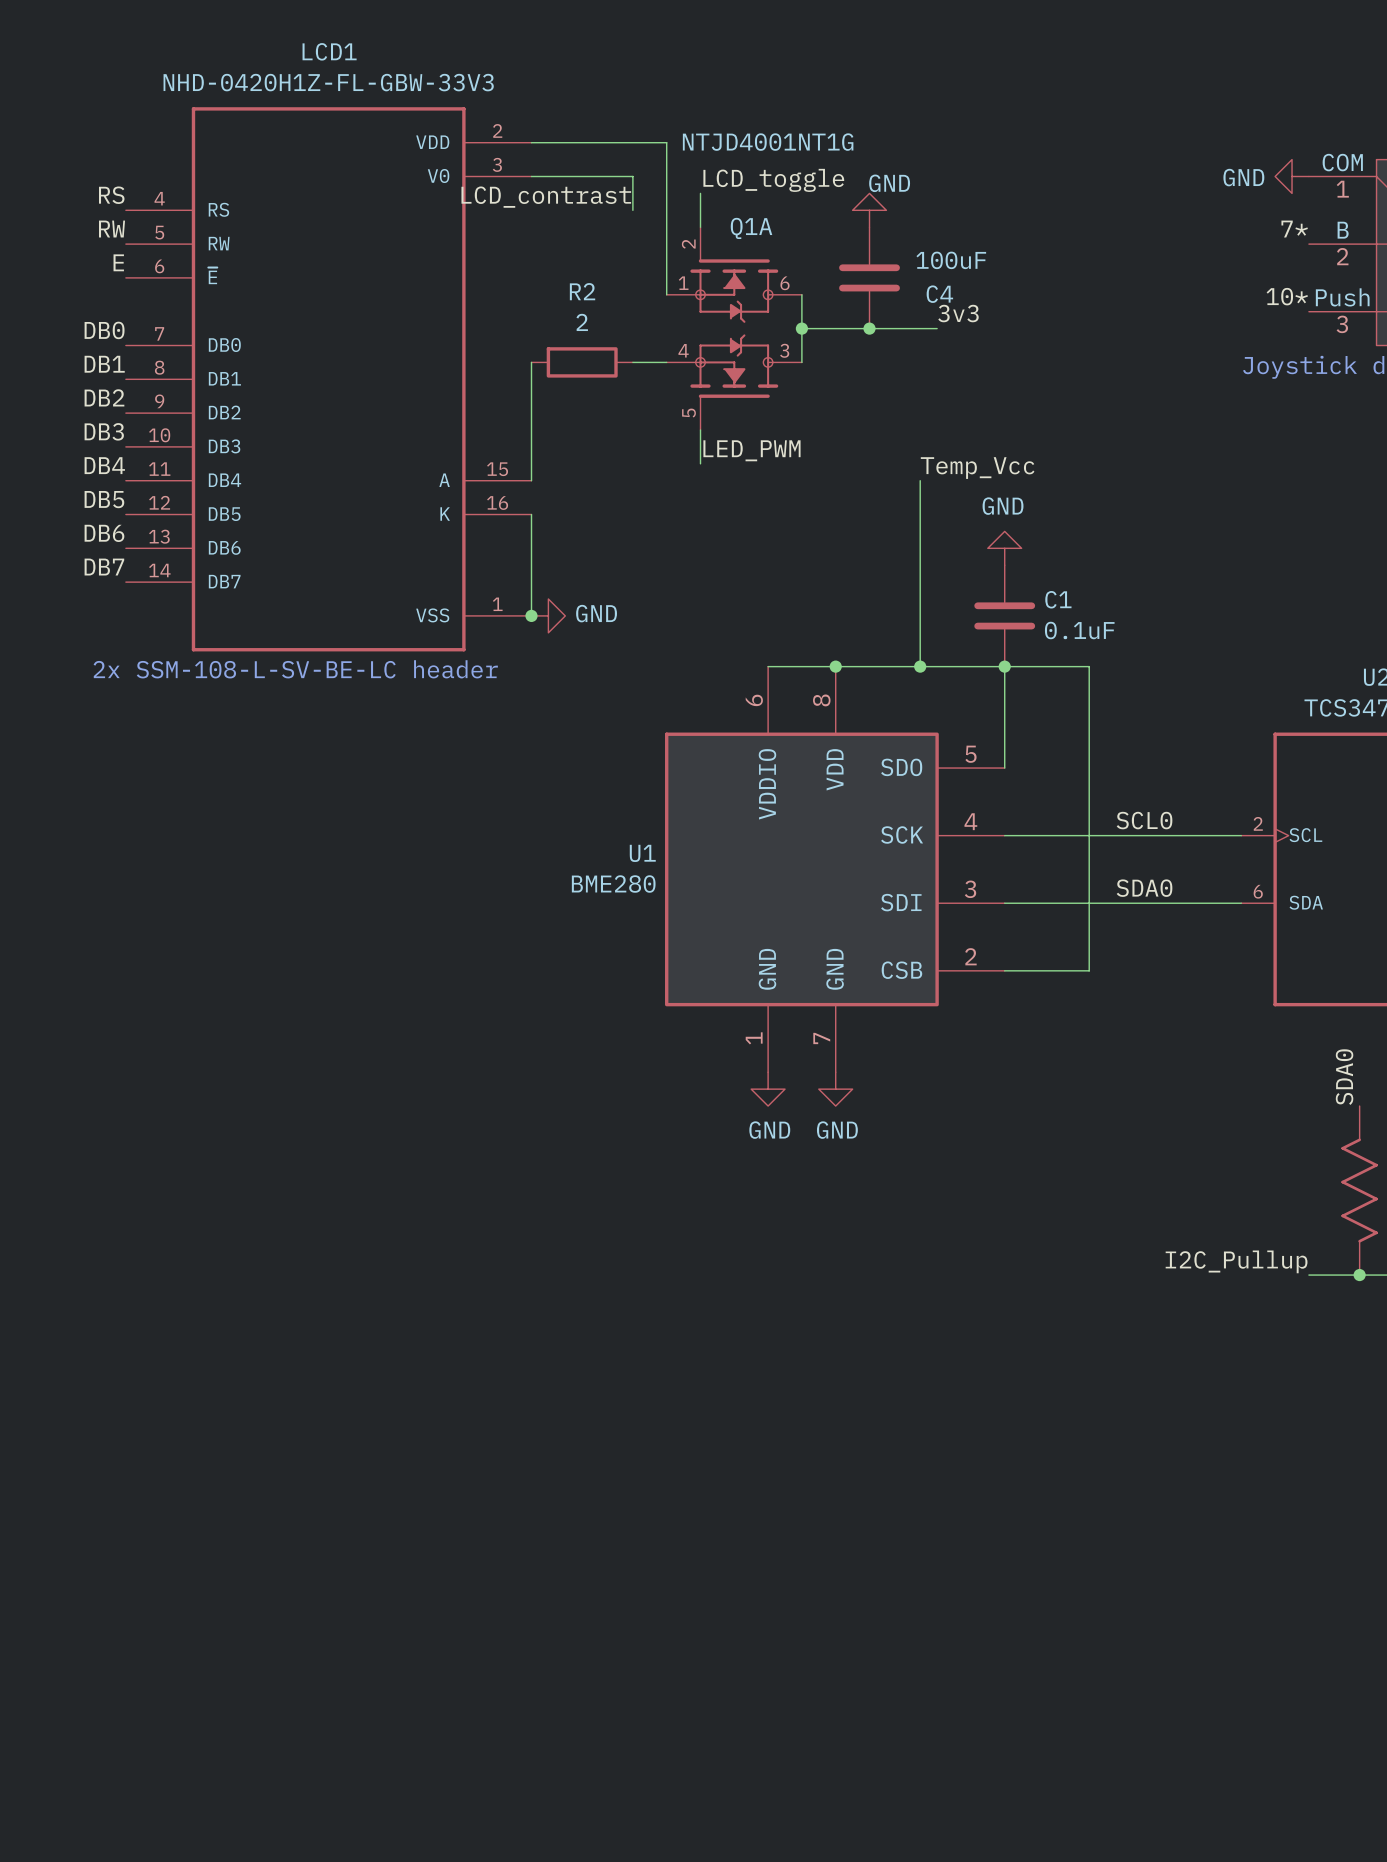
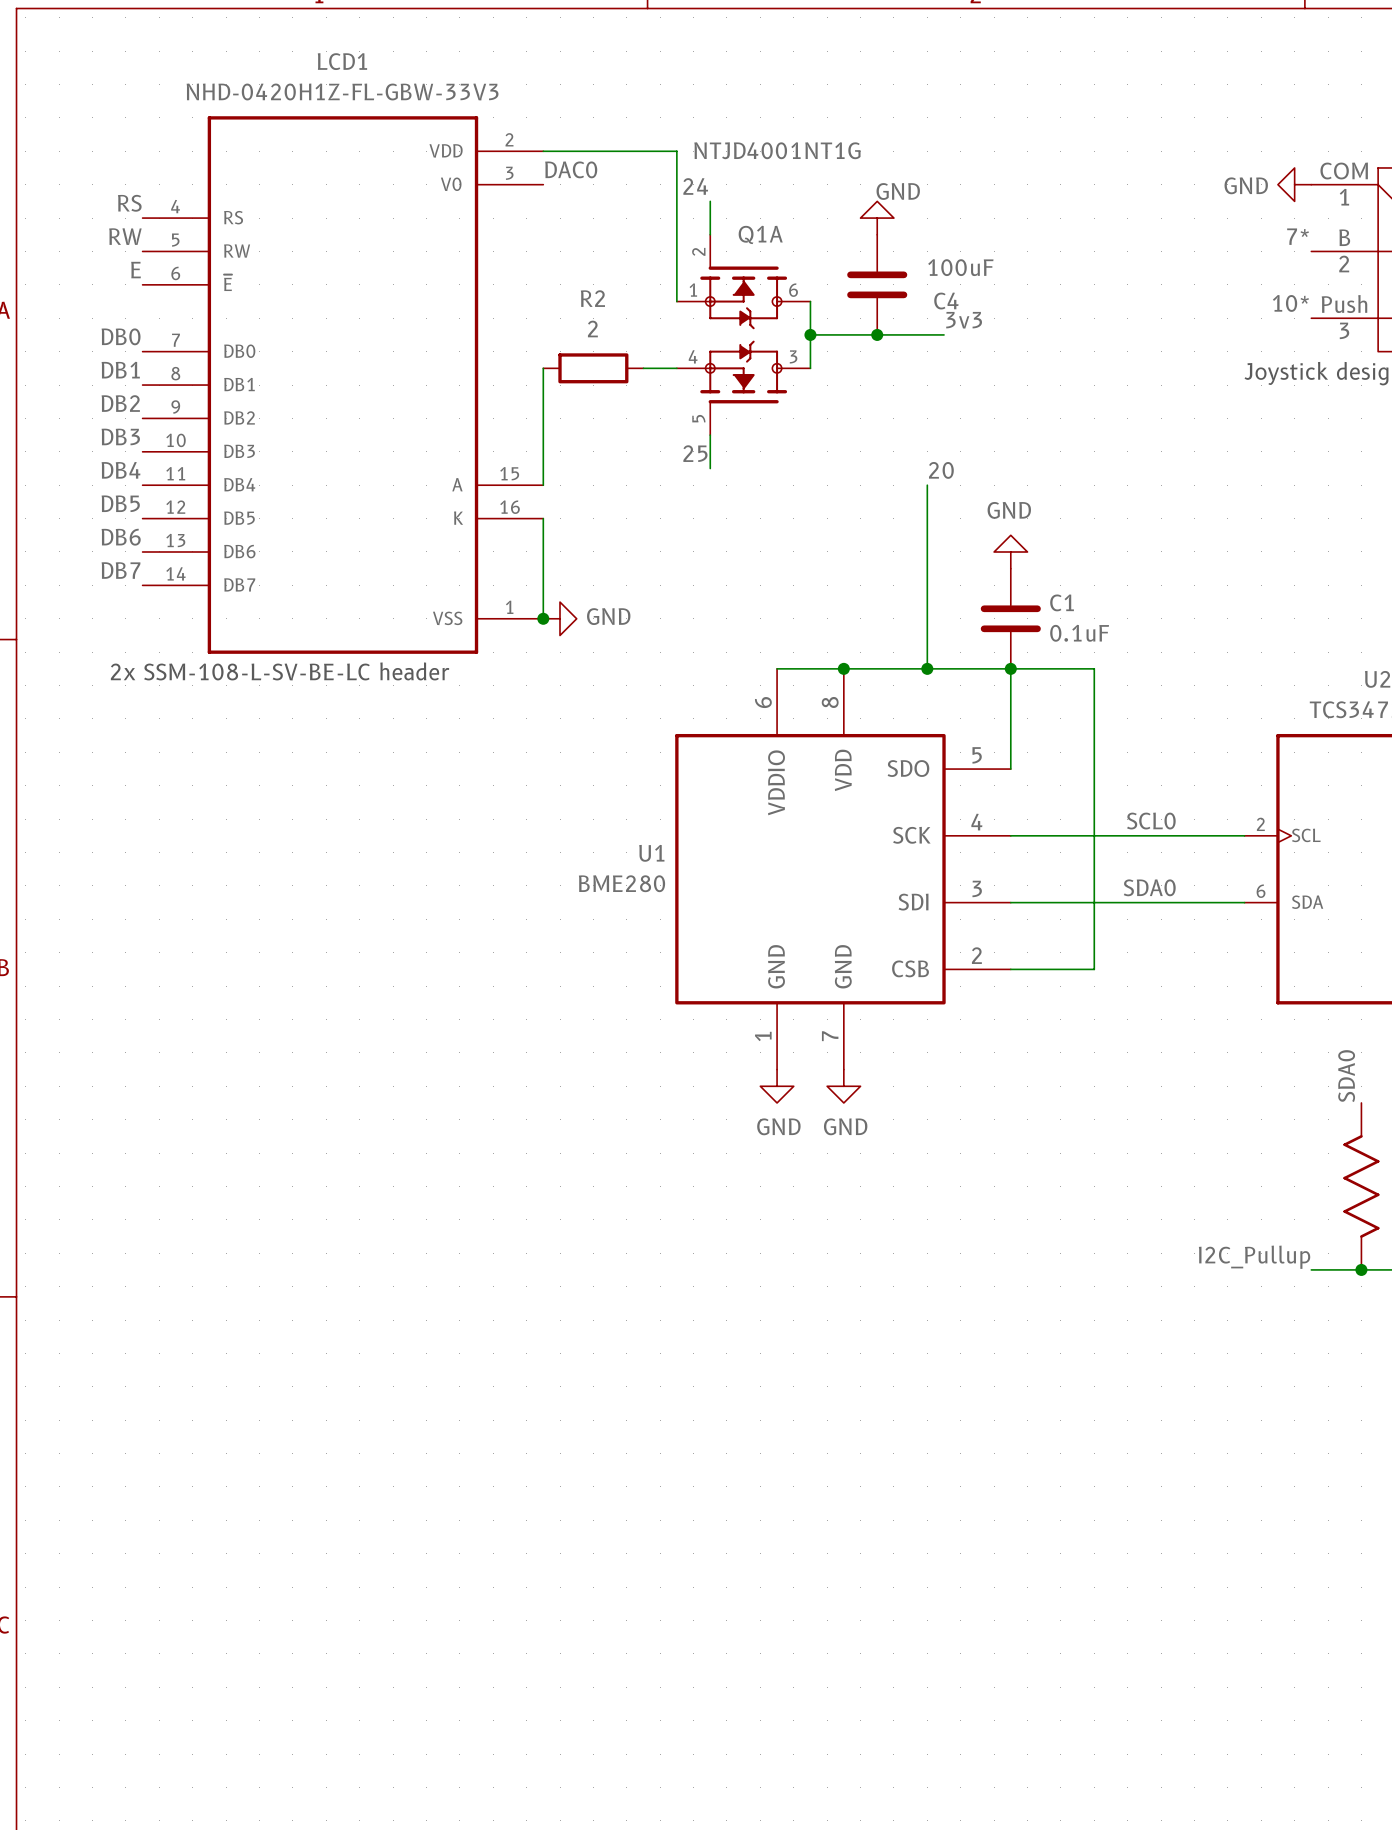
label: none -> DAC0 (571, 169)
wire: (531, 176) (632, 176) (632, 210) -> none
label: LCD_toggle (773, 180) -> 24 (695, 186)
label: LCD_contrast (546, 197) -> none
label: LED_PWM (751, 450) -> 25 (695, 453)
label: Temp_Vcc (977, 468) -> 20 (941, 470)

